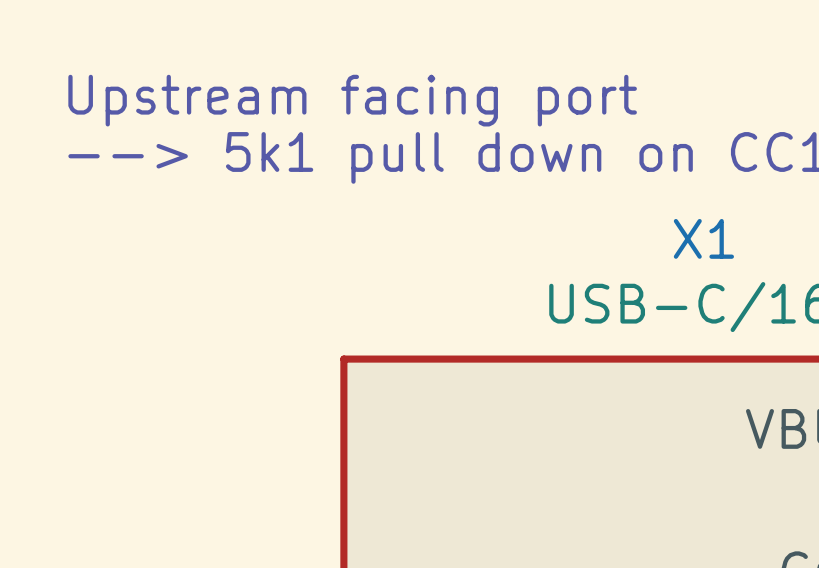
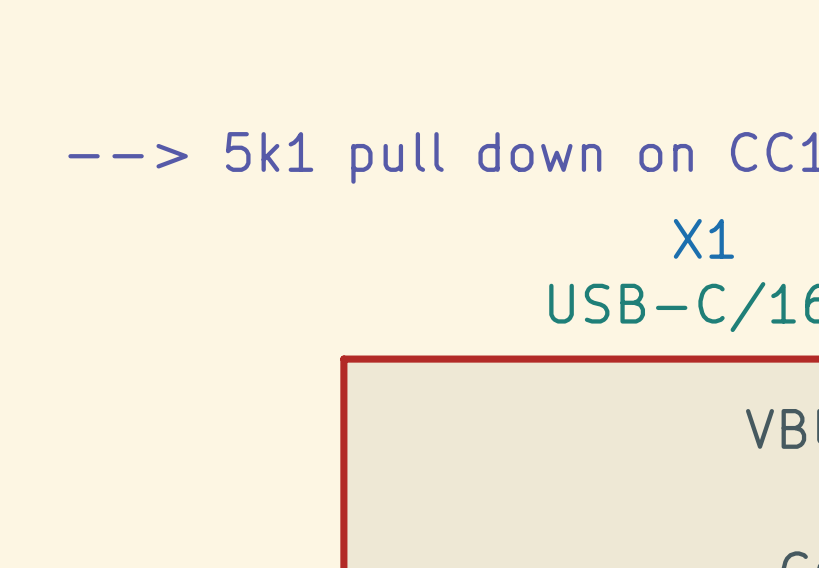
text: Upstream facing port (352, 100) -> none

